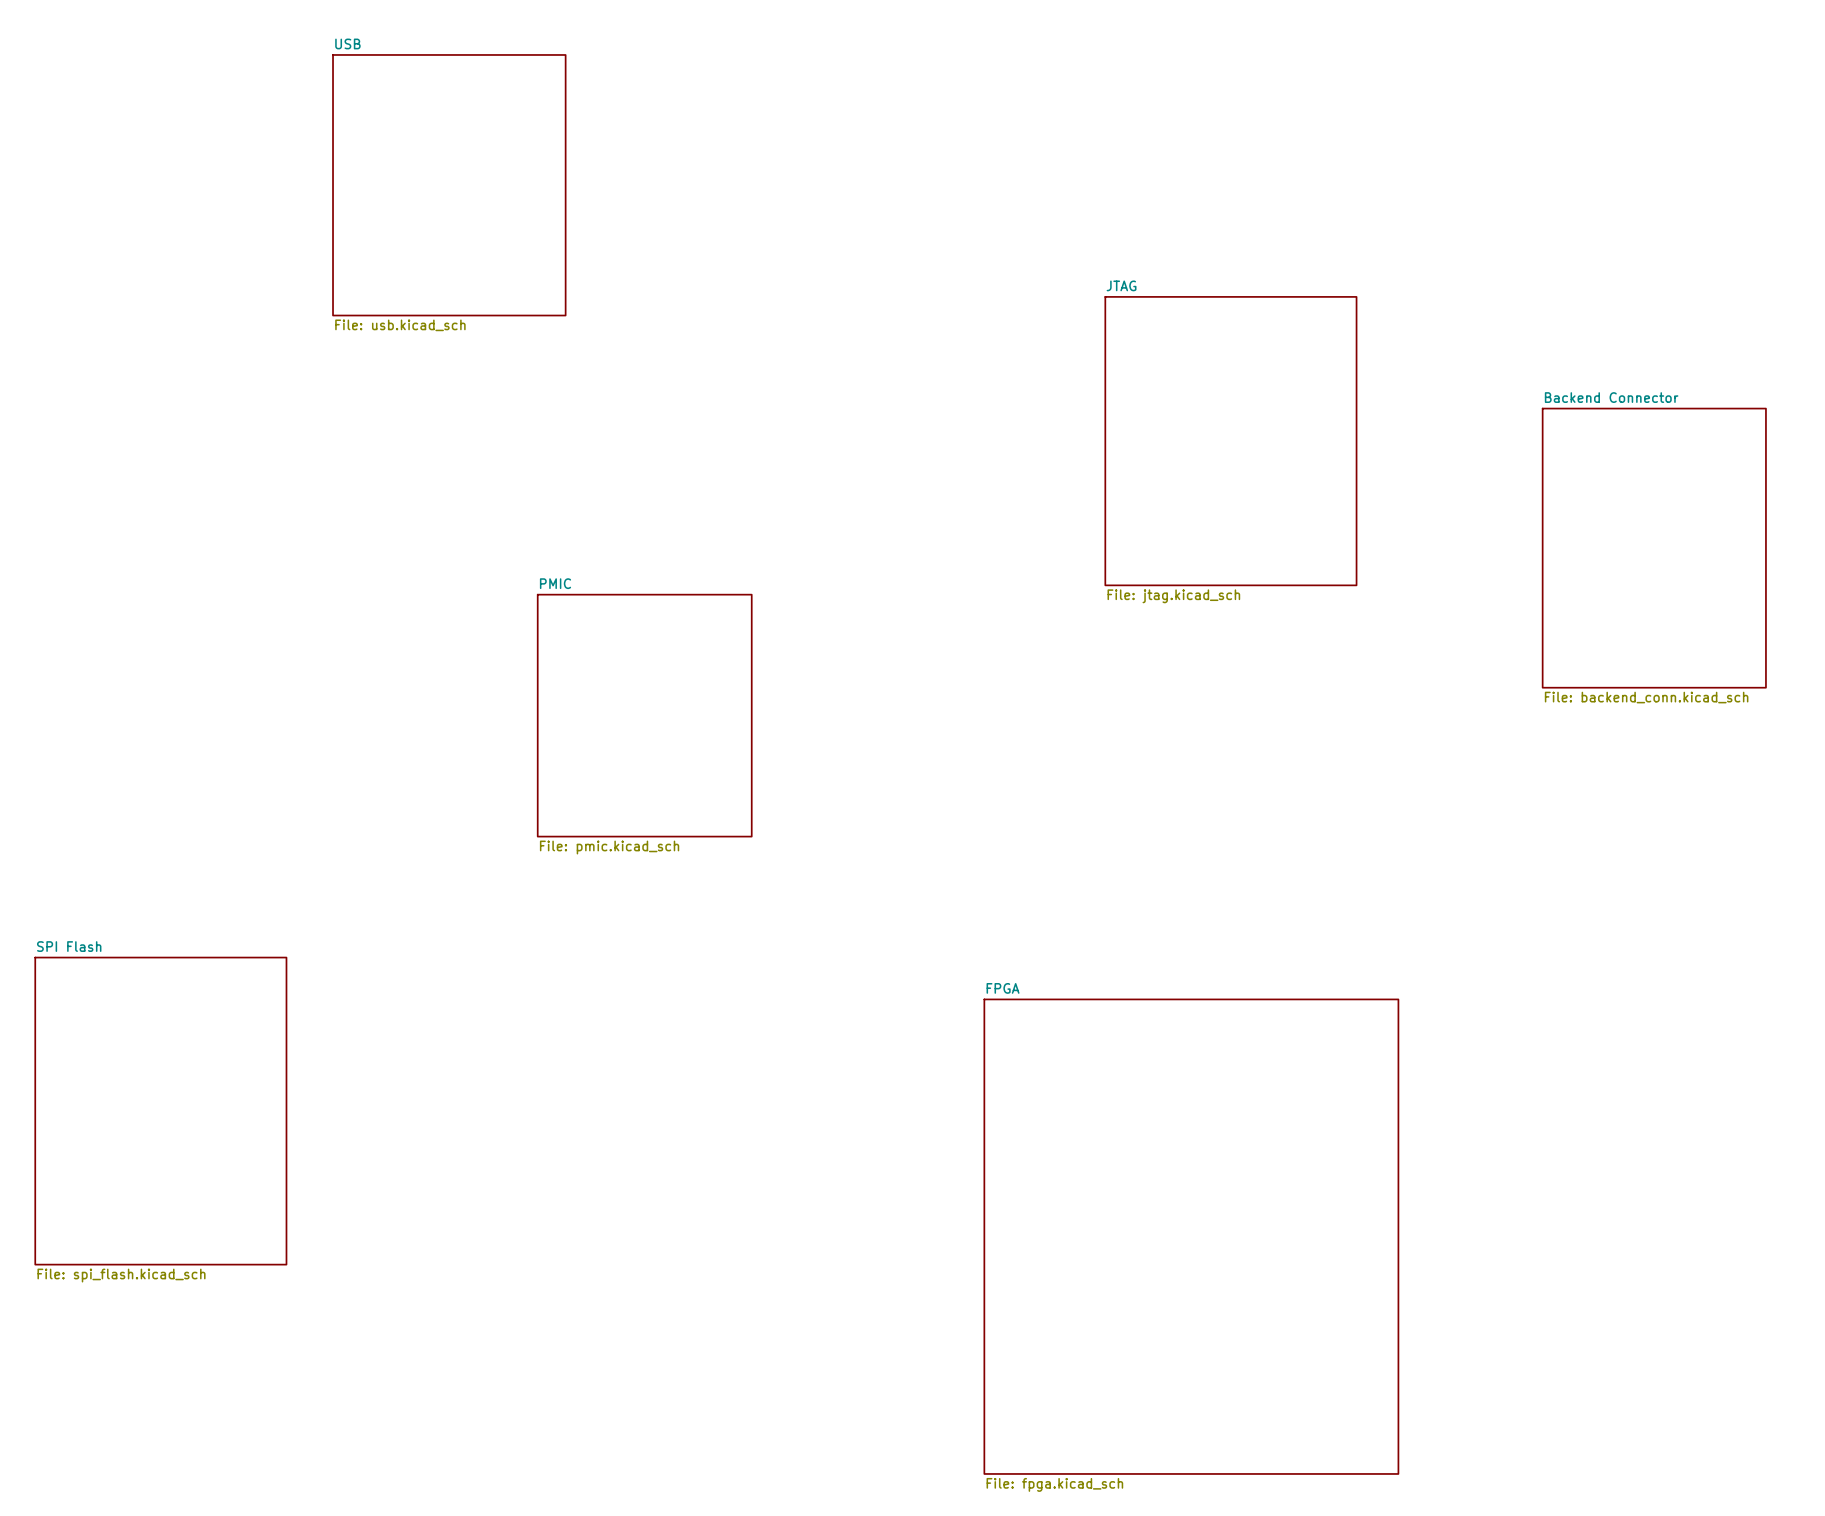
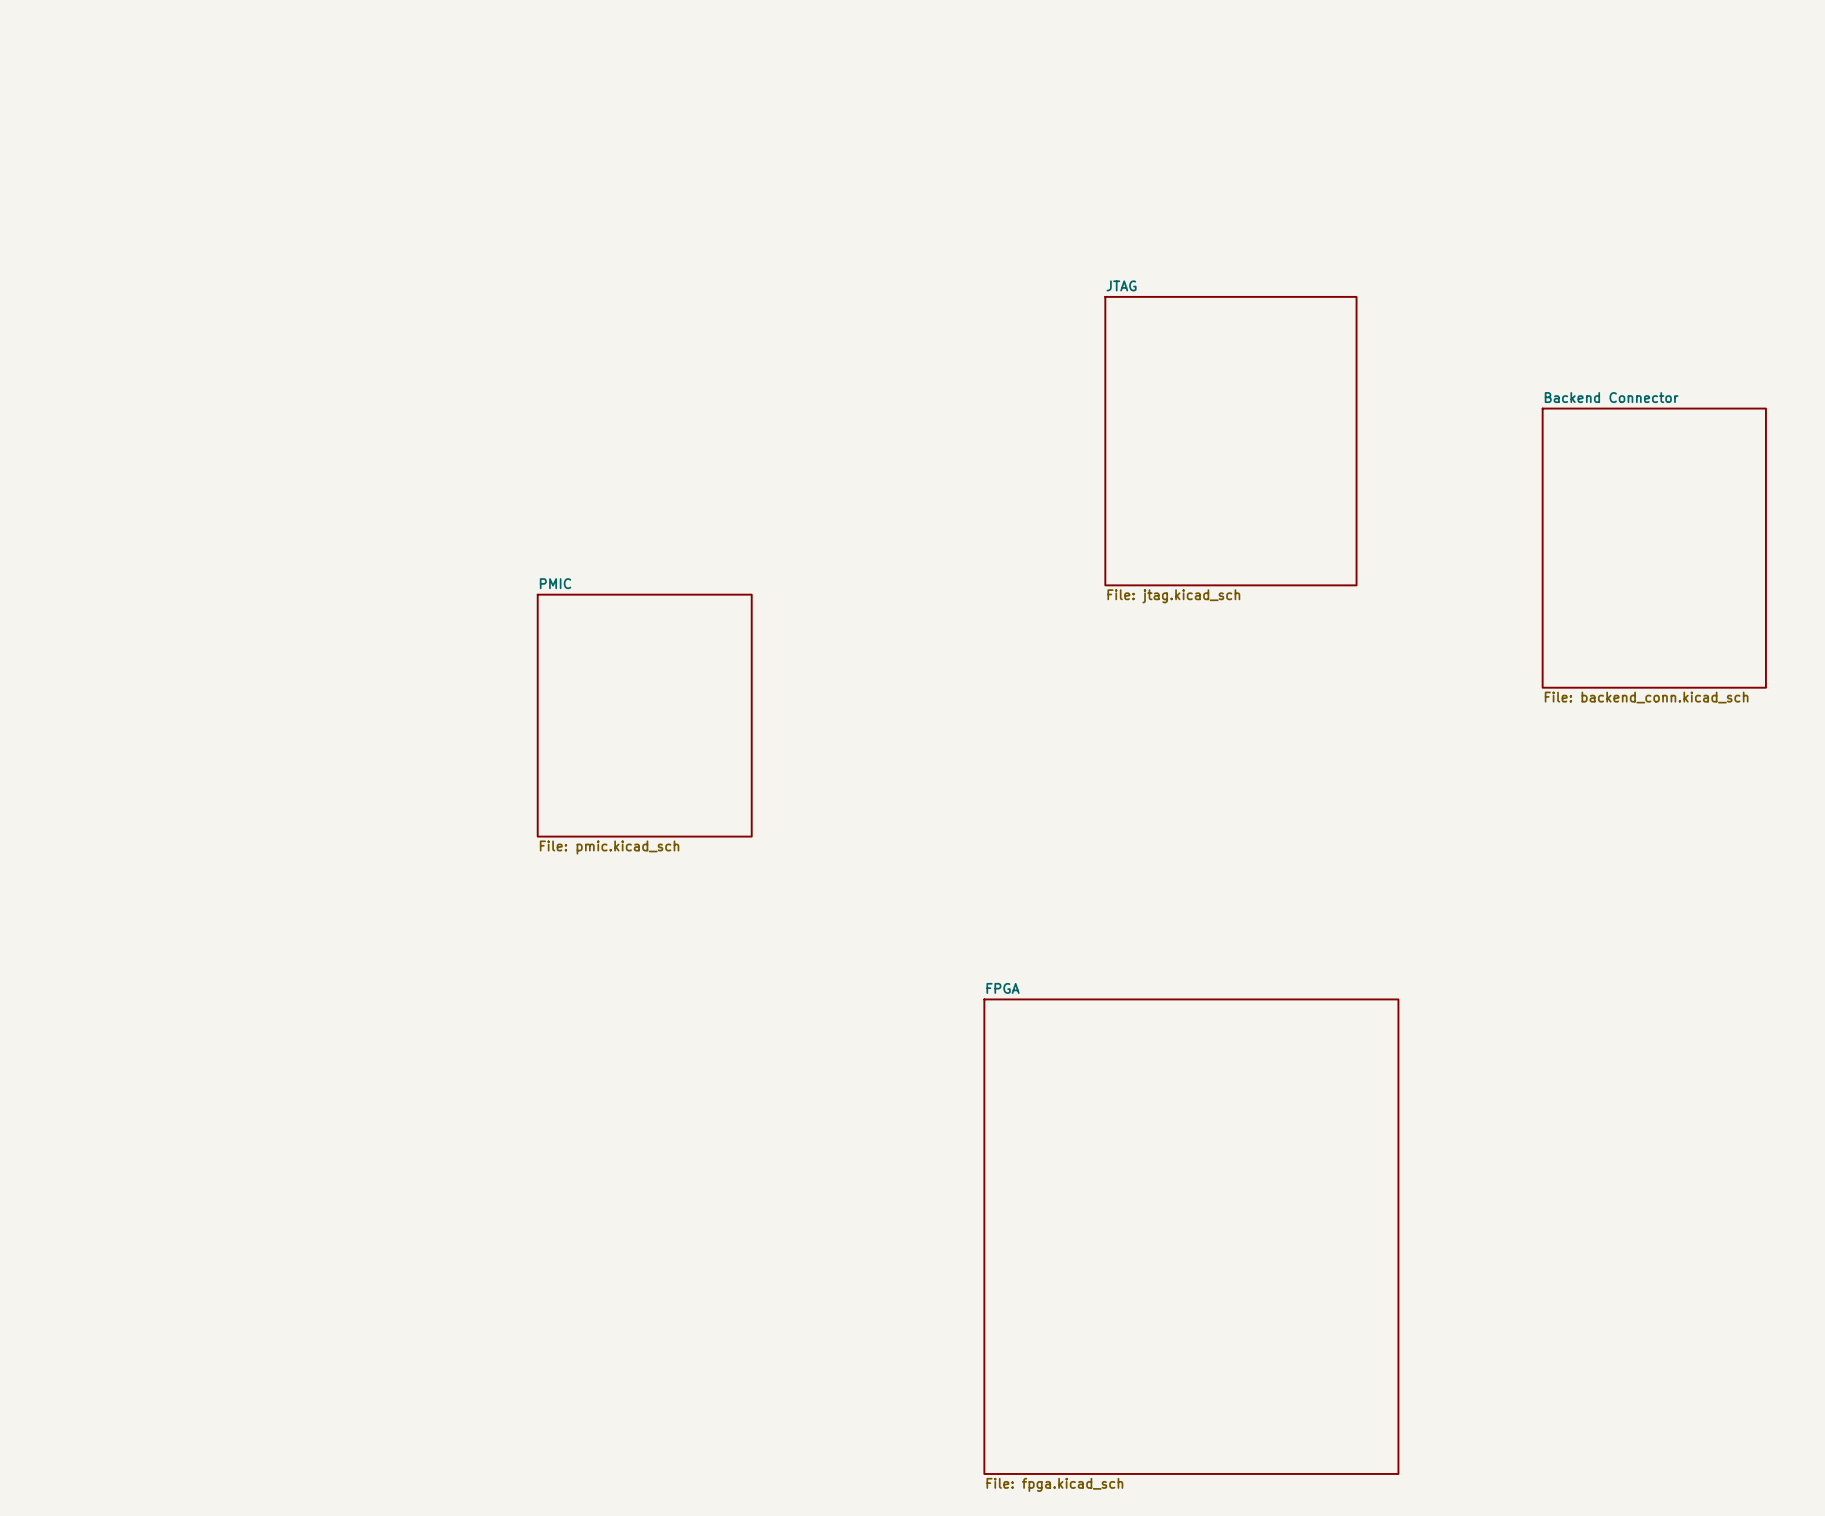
sheet USB: File: usb.kicad_sch (449, 185) -> none
sheet SPI Flash: File: spi_flash.kicad_sch (160, 1111) -> none

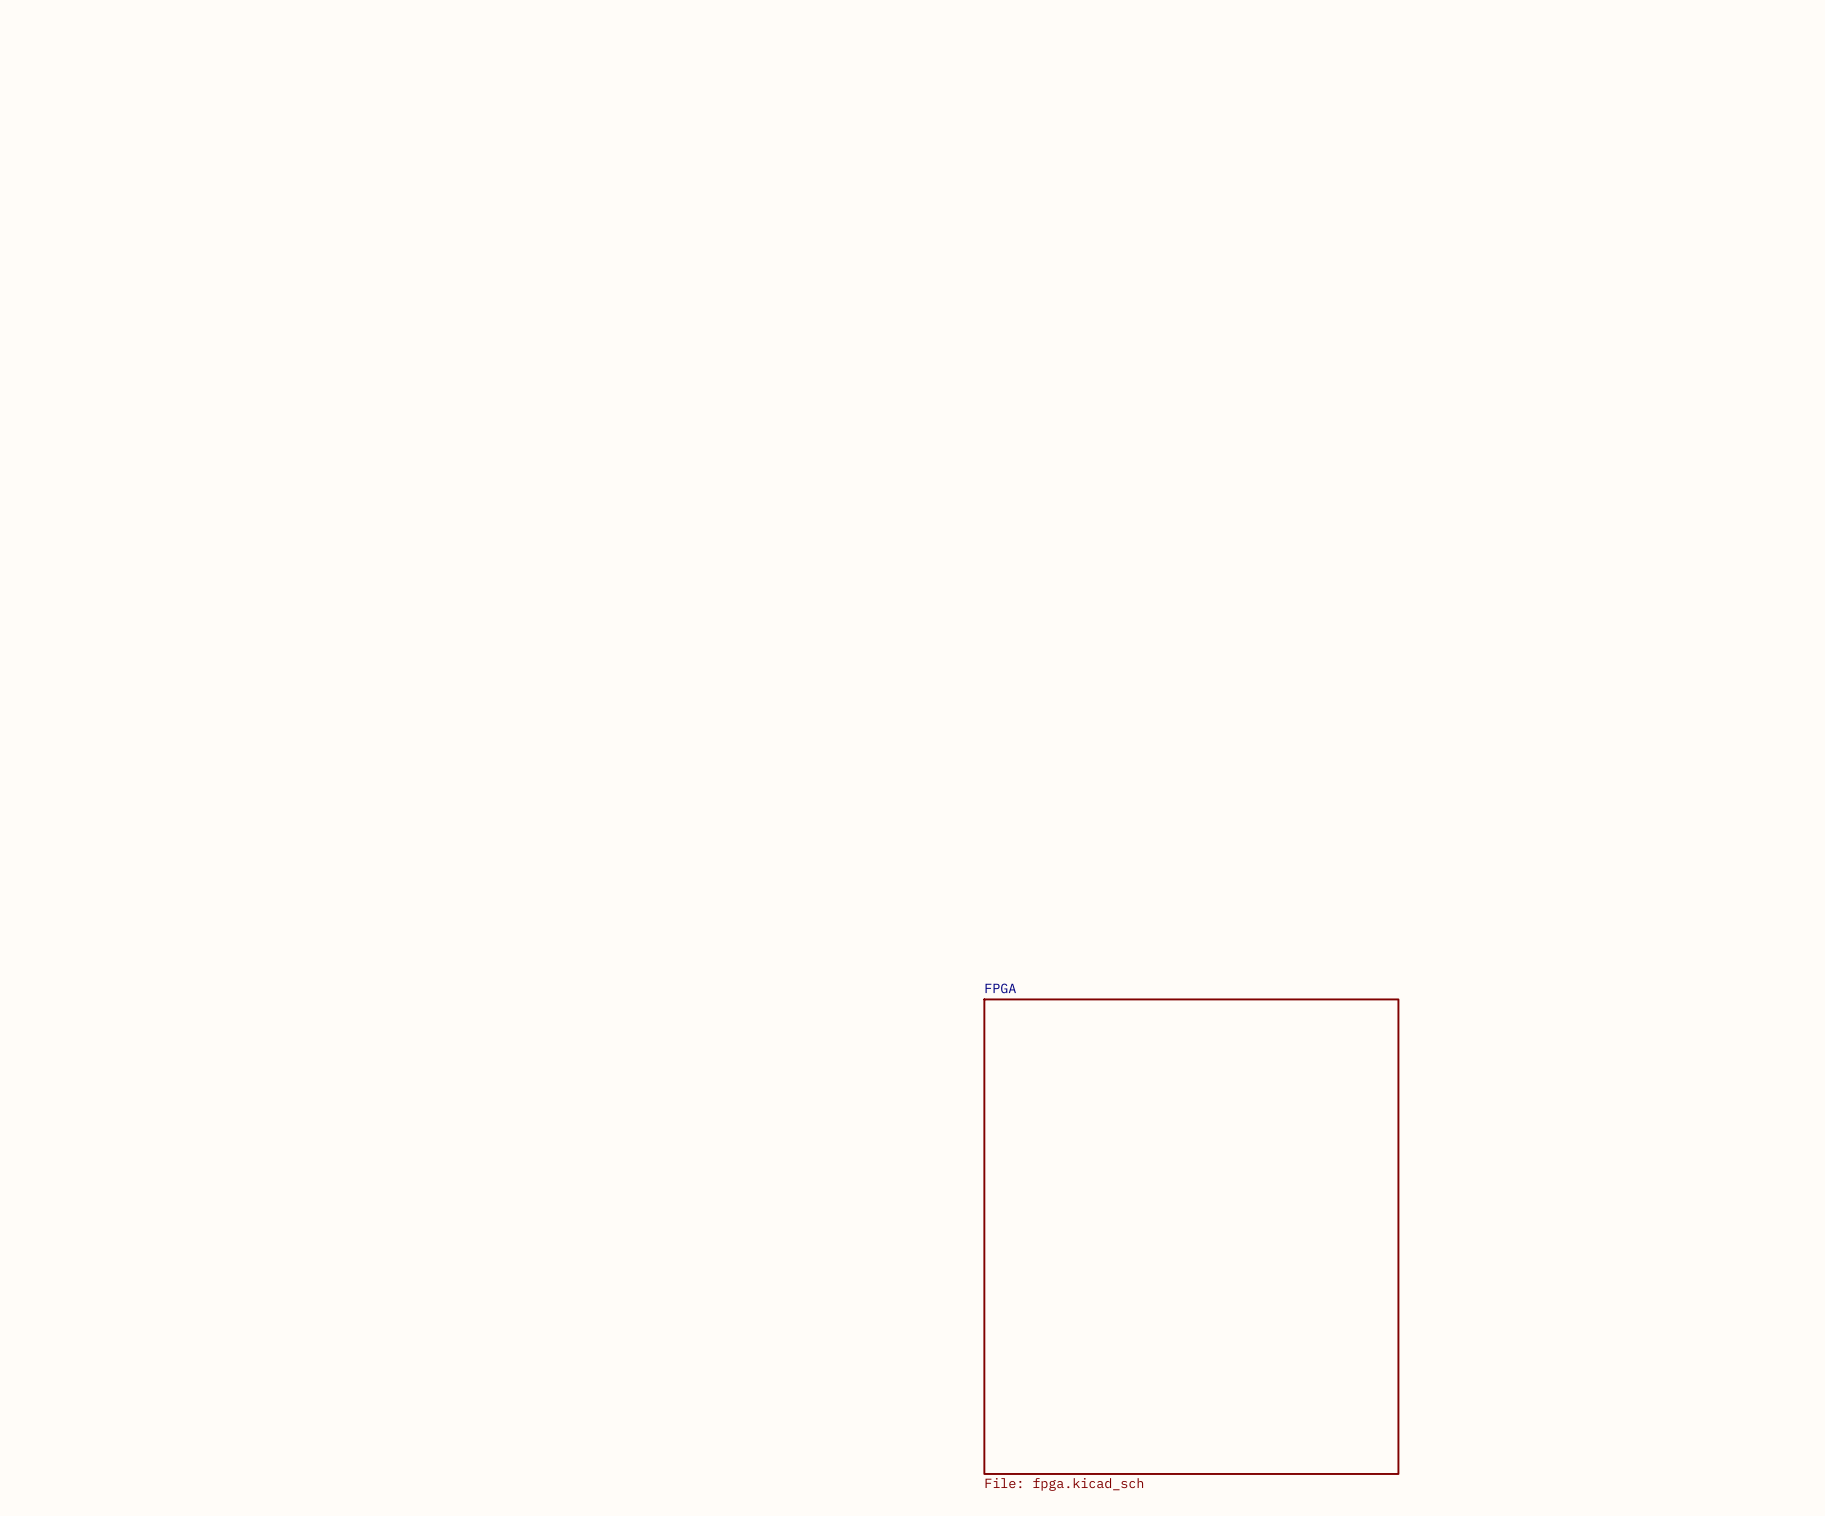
sheet JTAG: File: jtag.kicad_sch (1230, 441) -> none
sheet Backend Connector: File: backend_conn.kicad_sch (1654, 548) -> none
sheet PMIC: File: pmic.kicad_sch (644, 715) -> none

